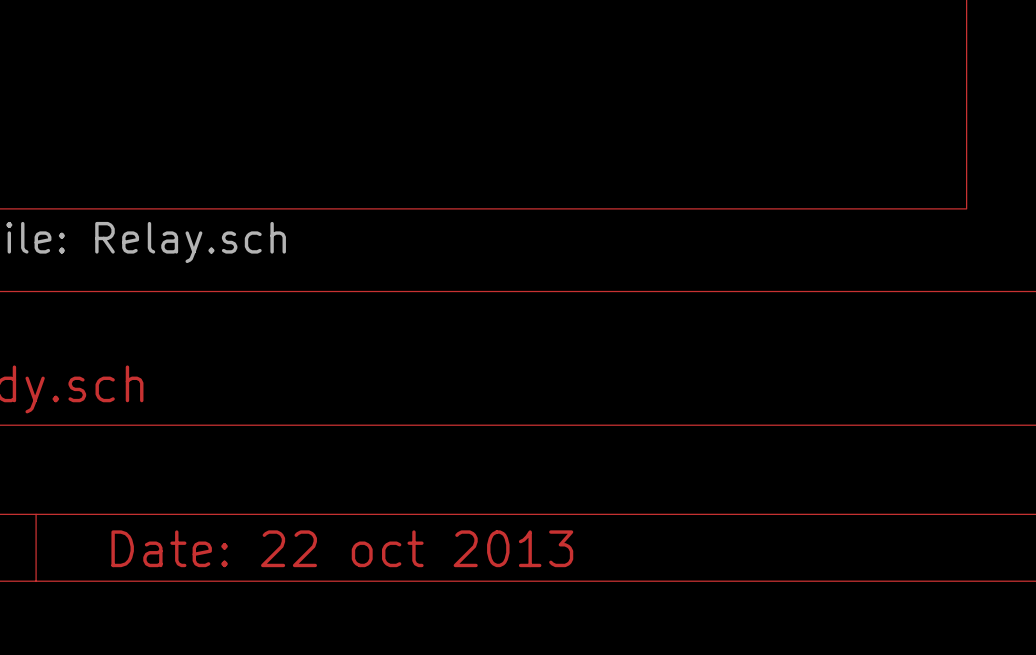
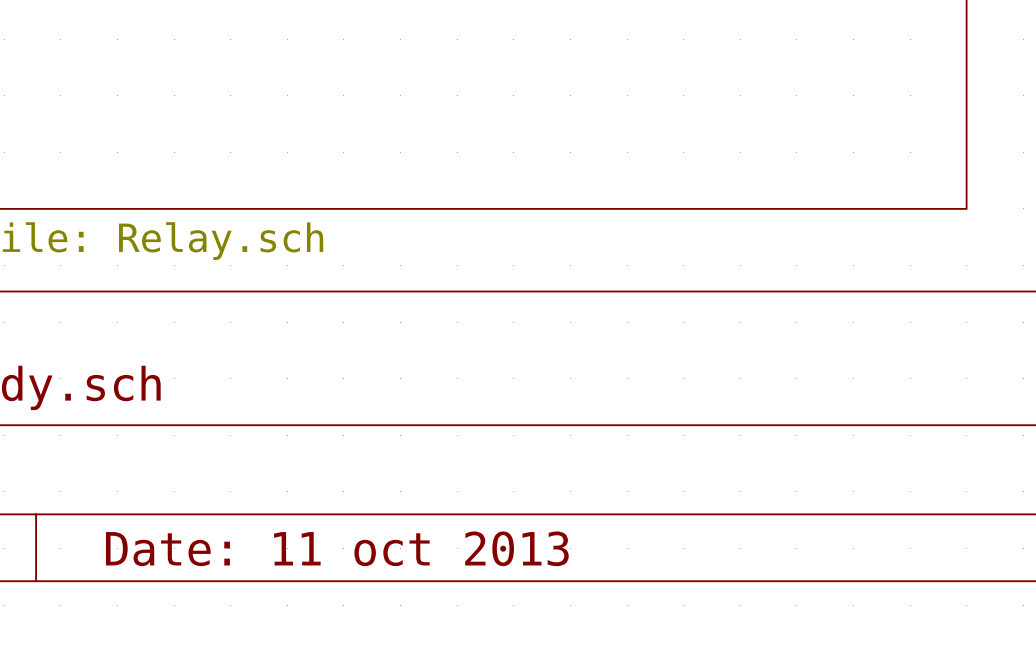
title block: Date: 22 oct 2013 (342, 548) -> Date: 11 oct 2013 (337, 548)

